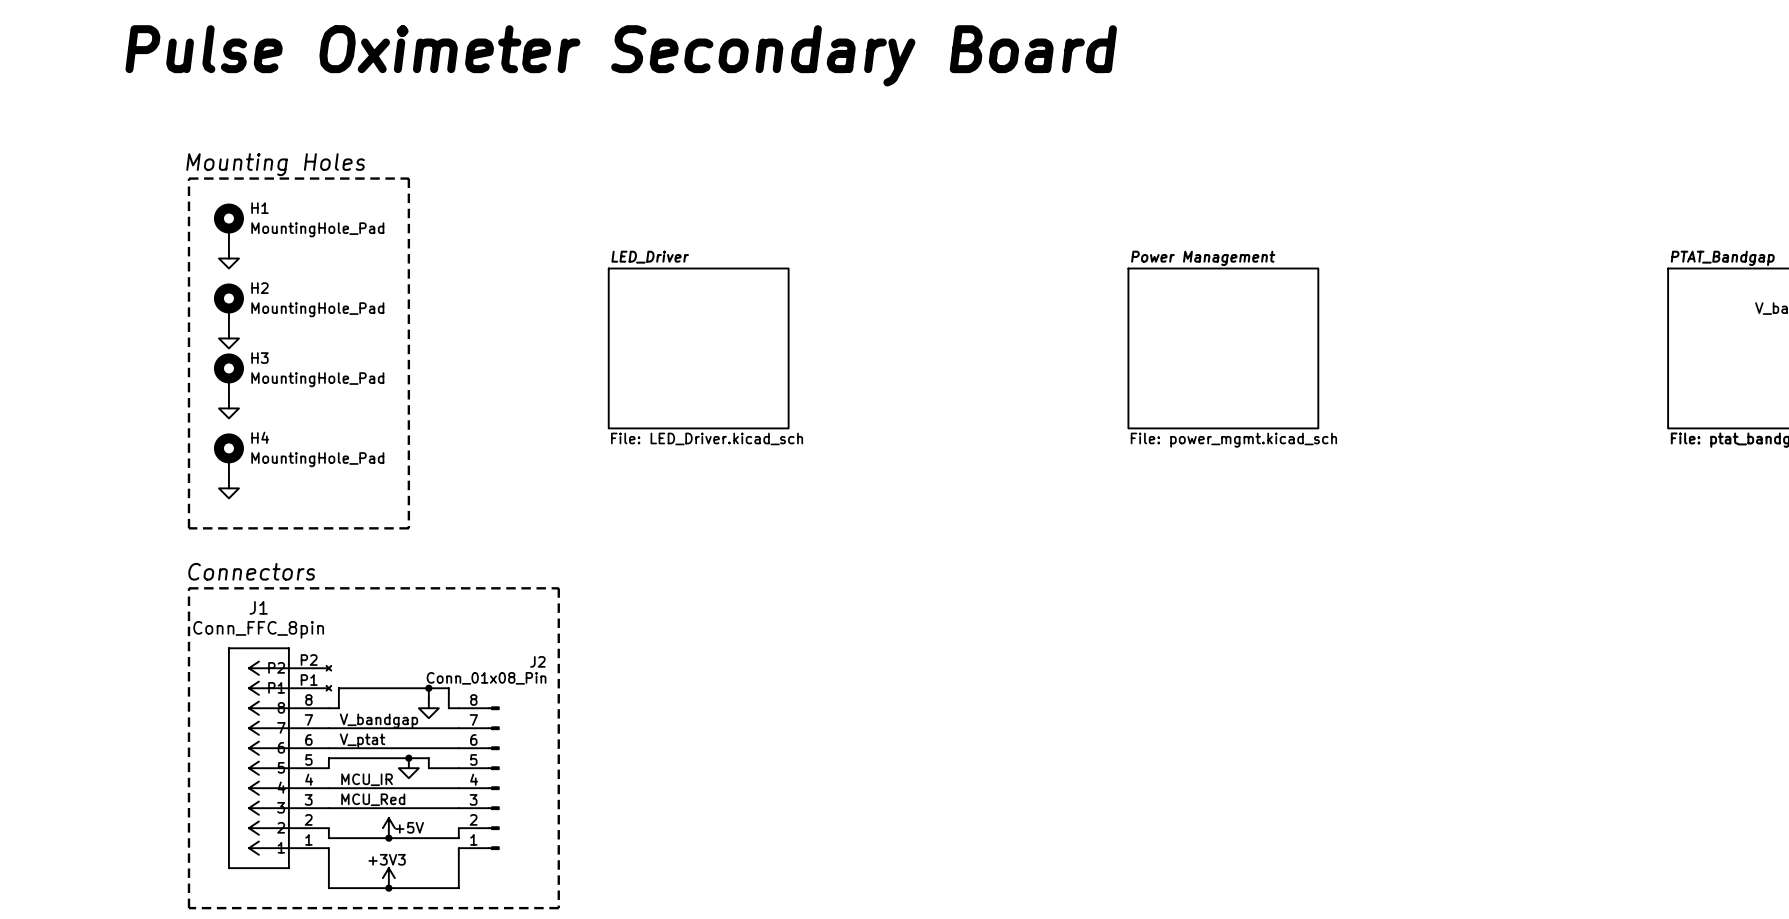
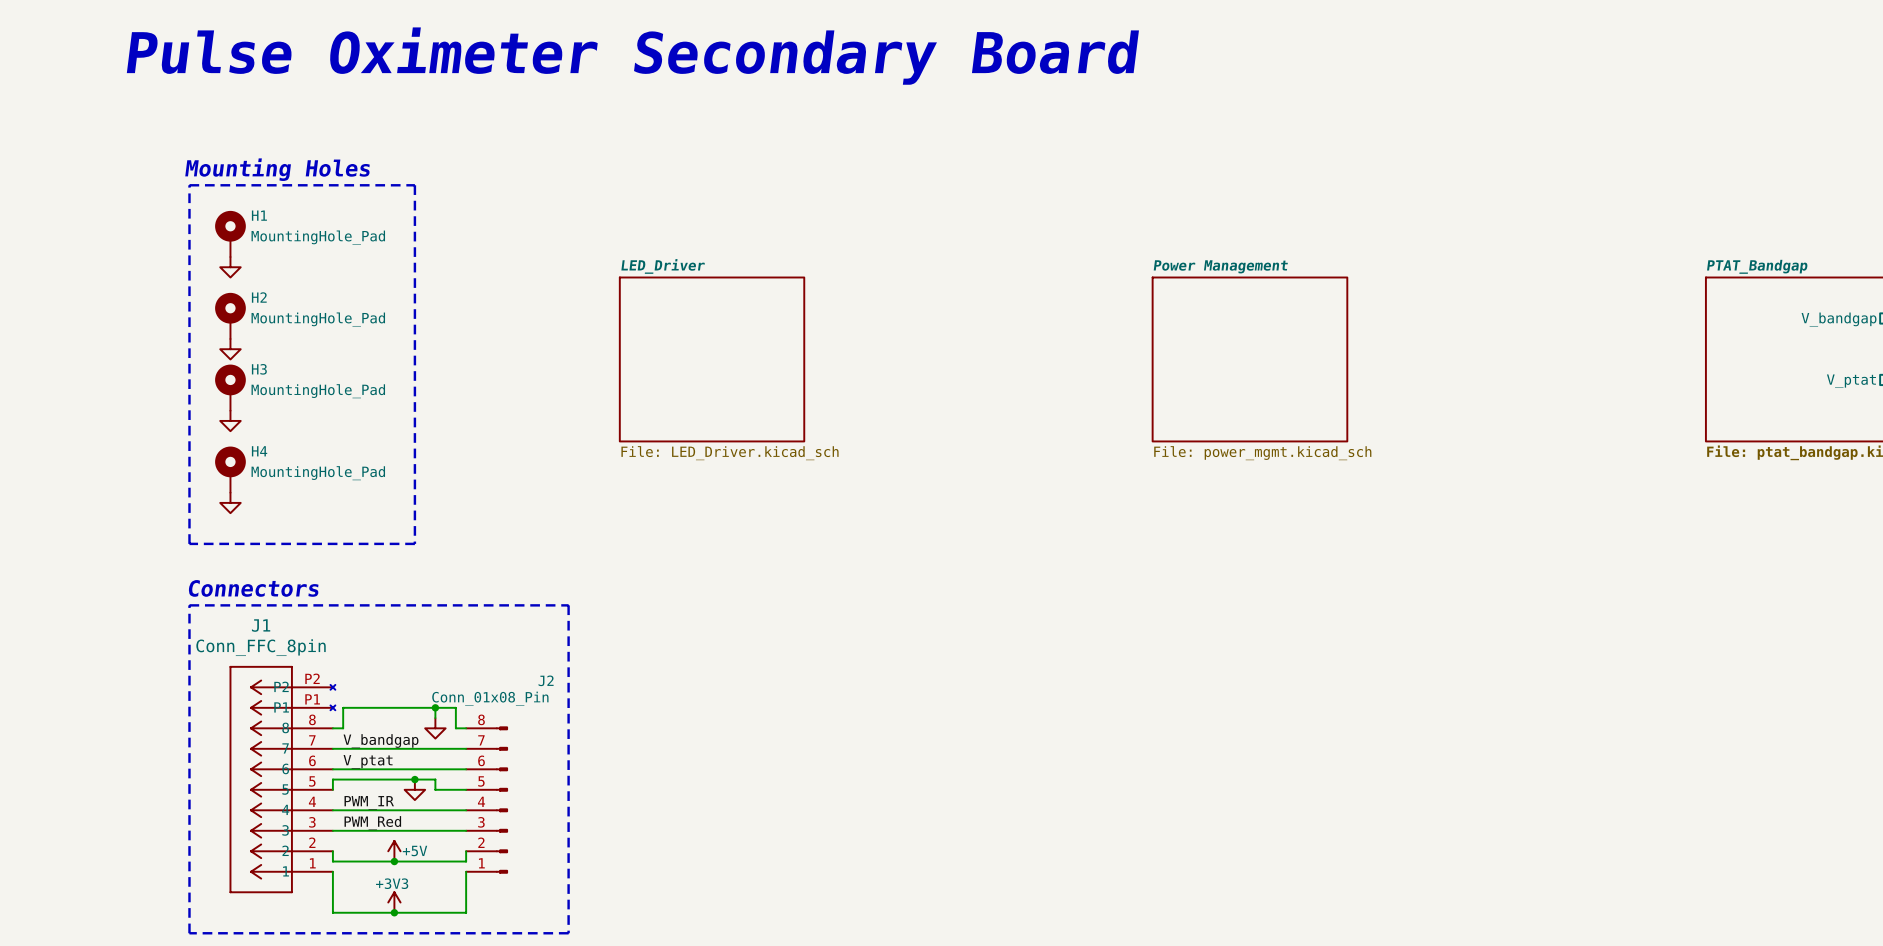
label: MCU_IR (367, 779) -> PWM_IR (369, 802)
label: MCU_Red (373, 799) -> PWM_Red (372, 823)

